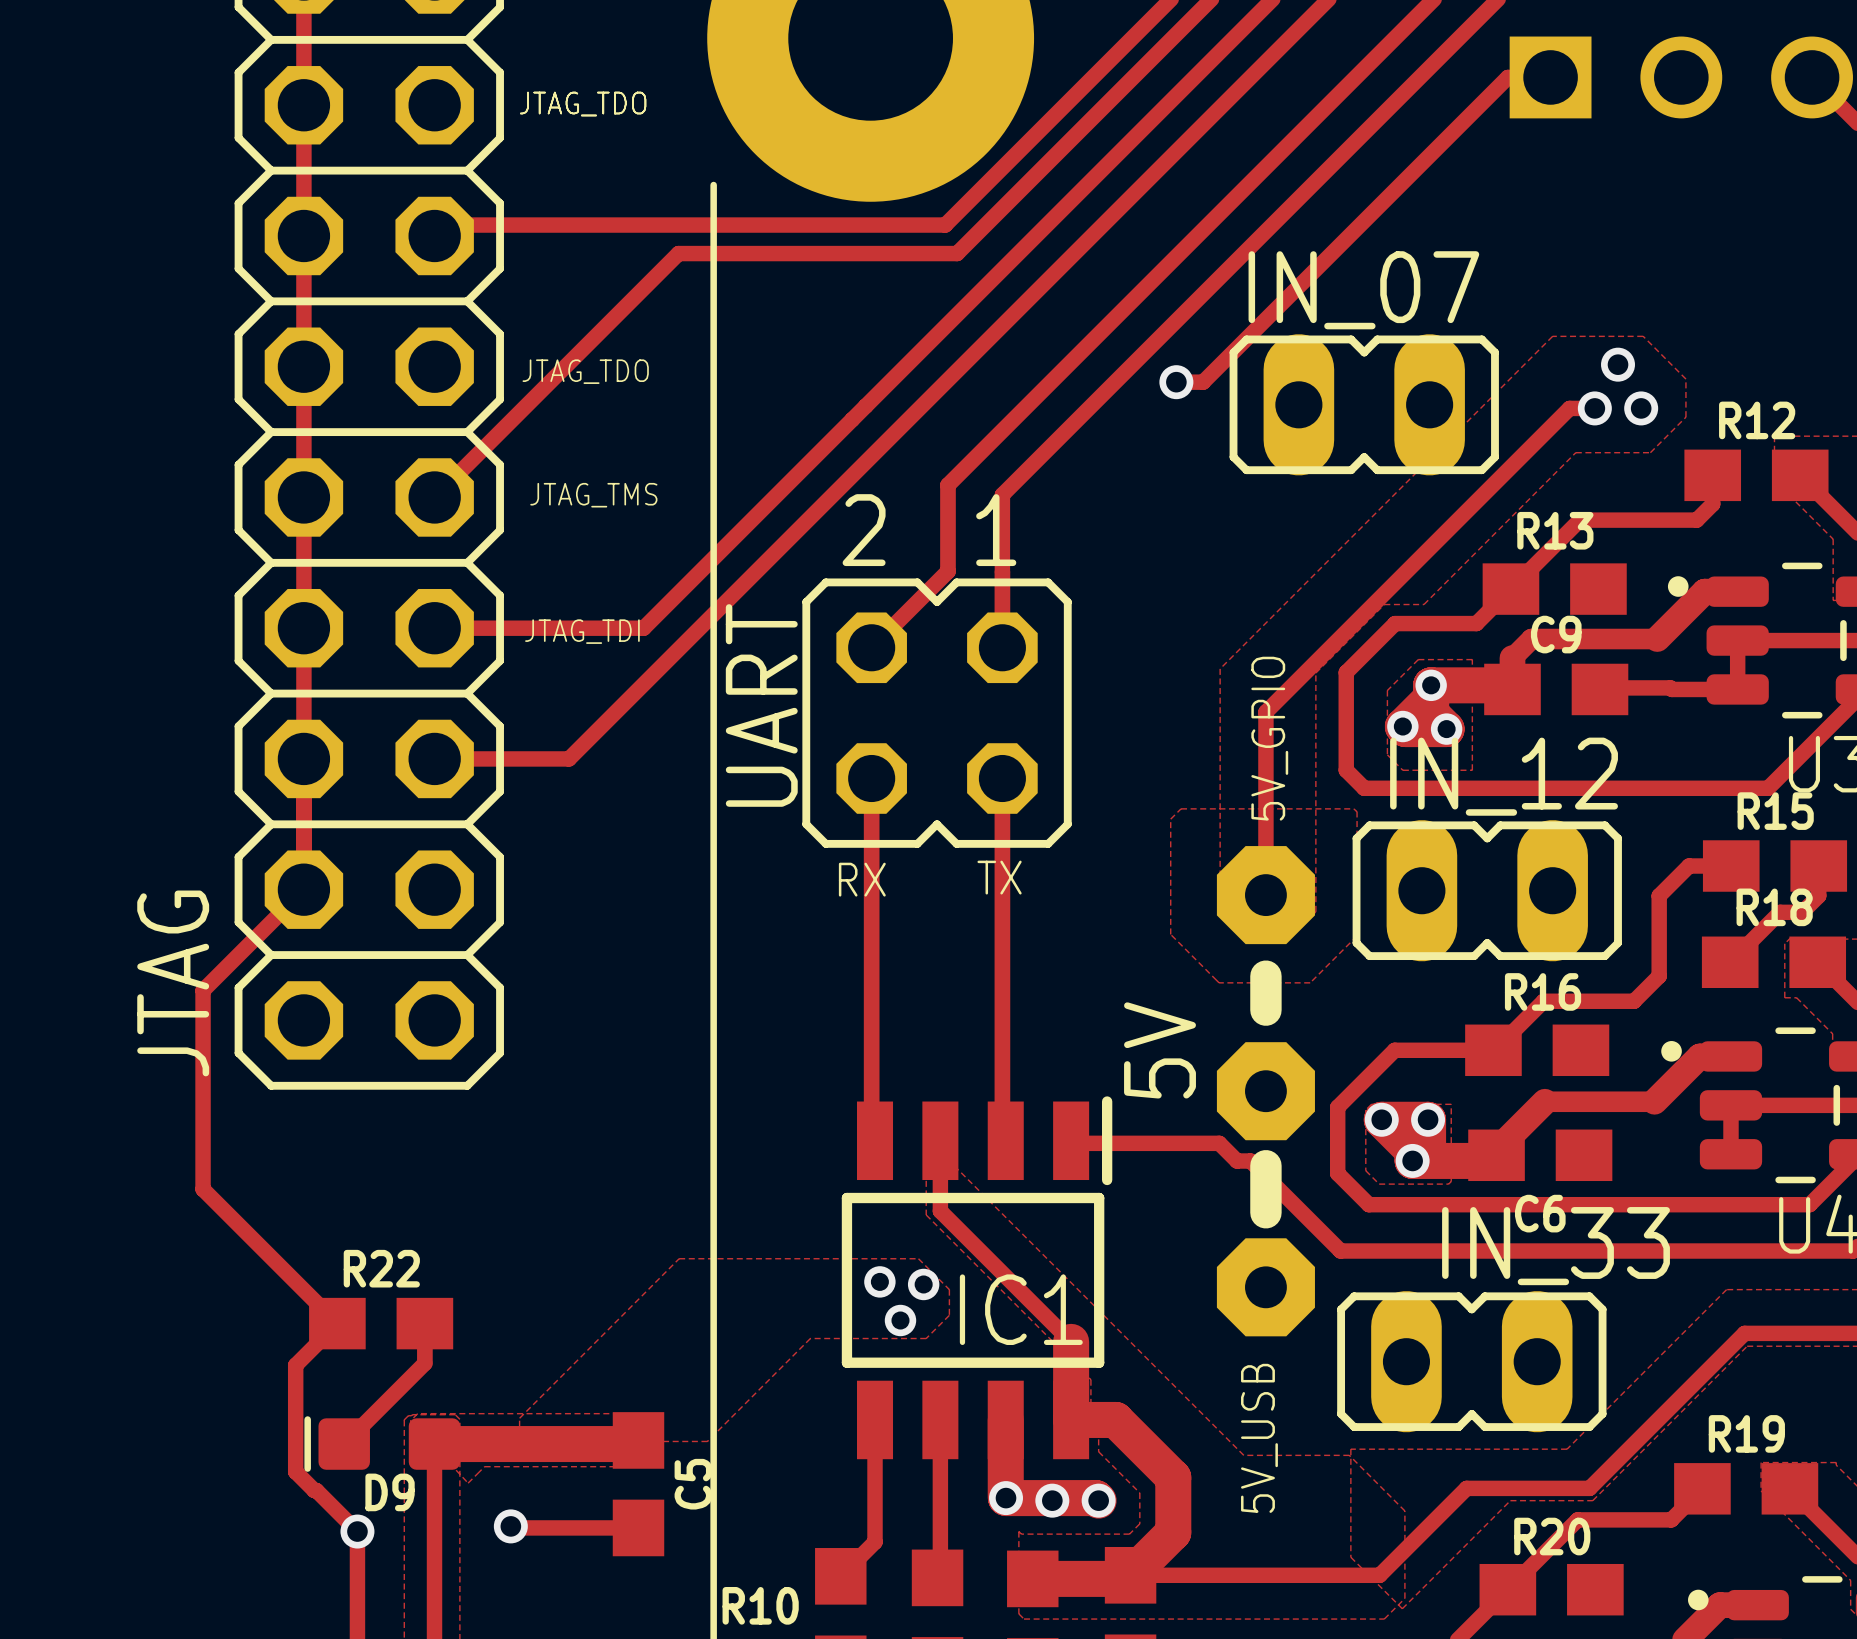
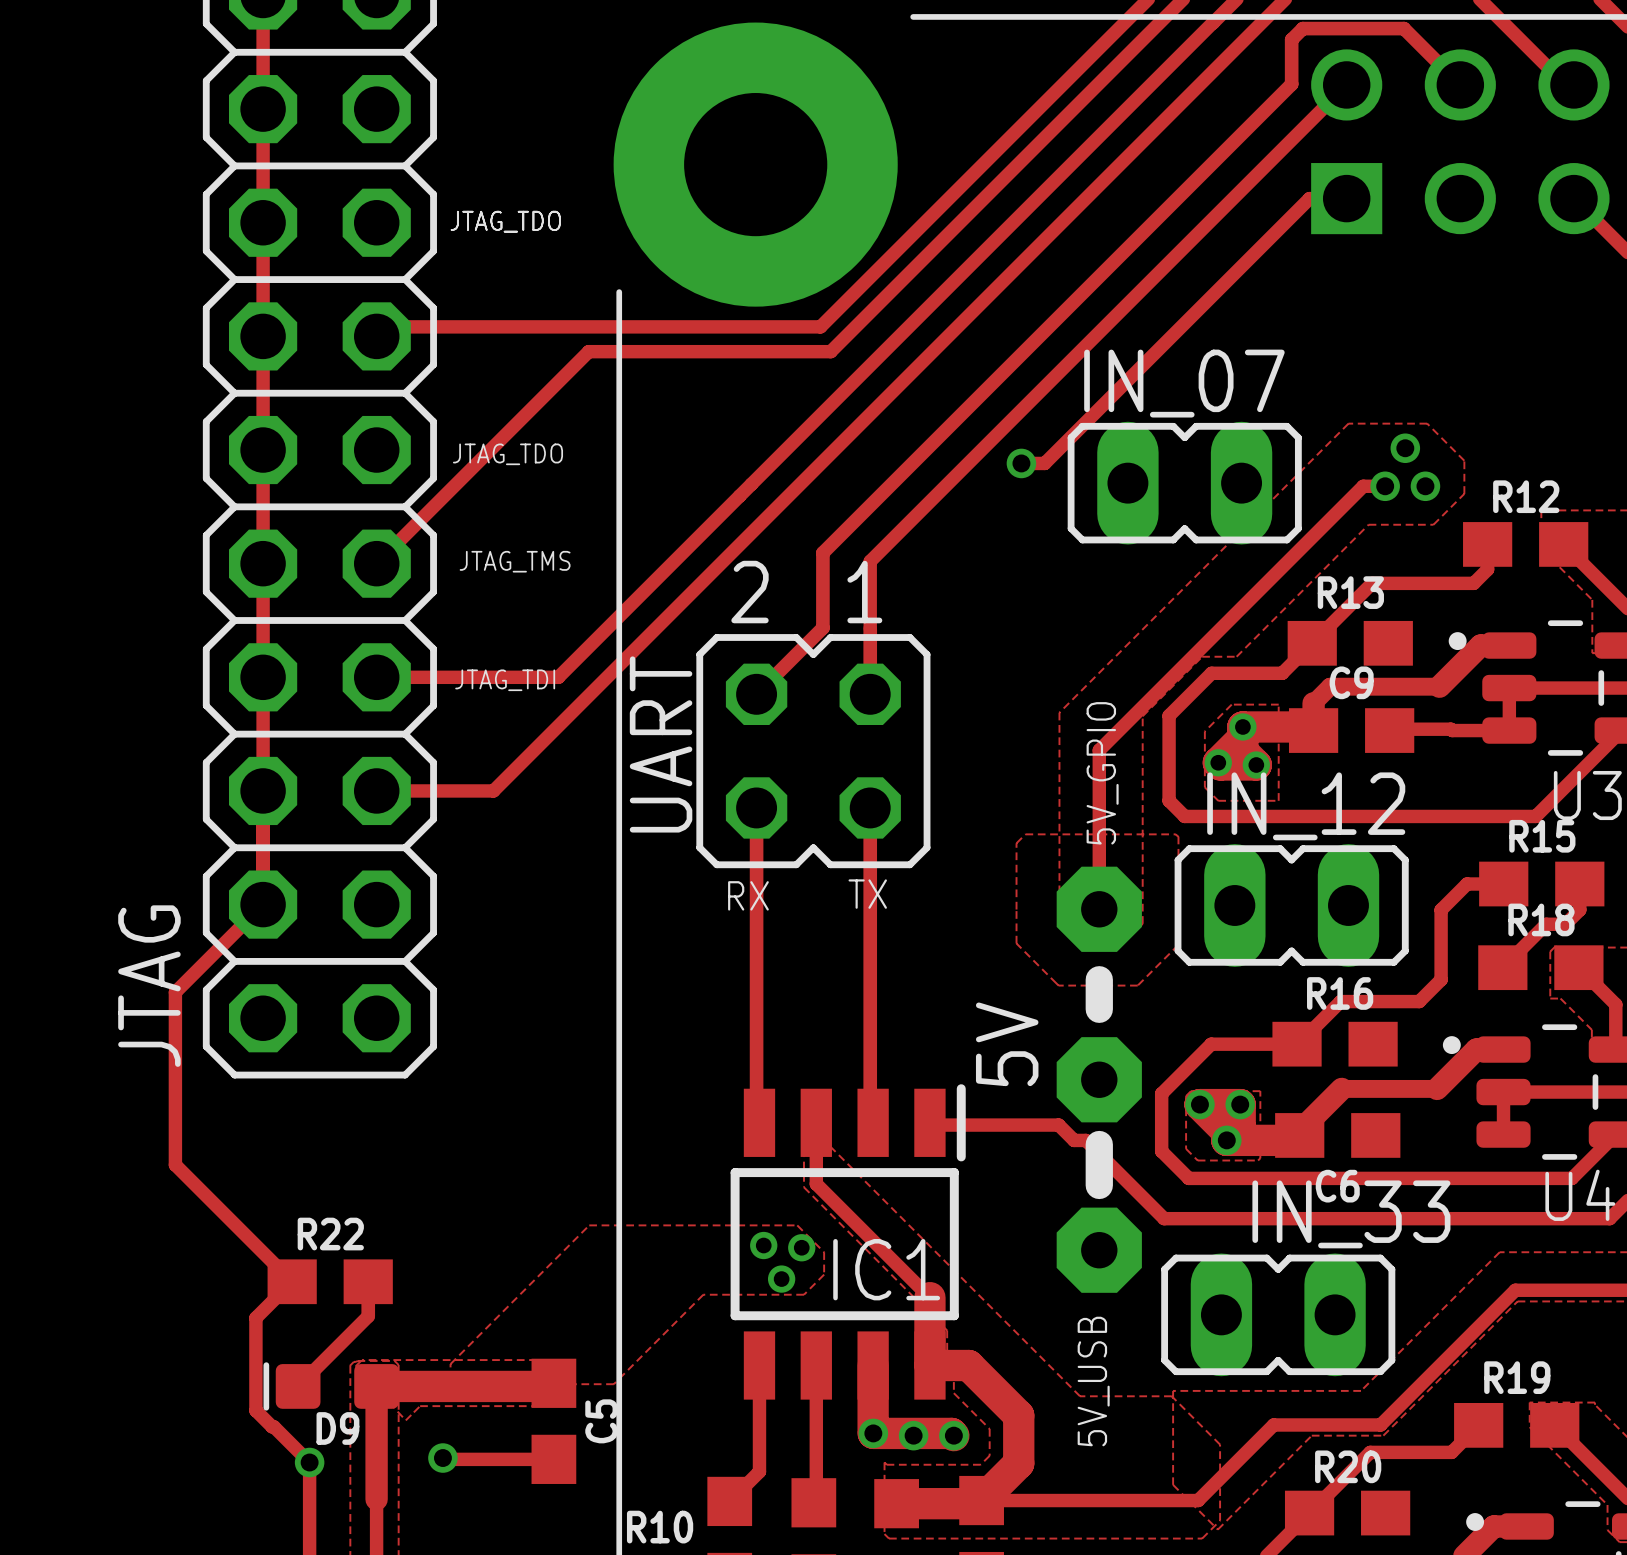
track width: thin (434, 1444) (434, 1573) -> thick (376, 1386) (376, 1499)

